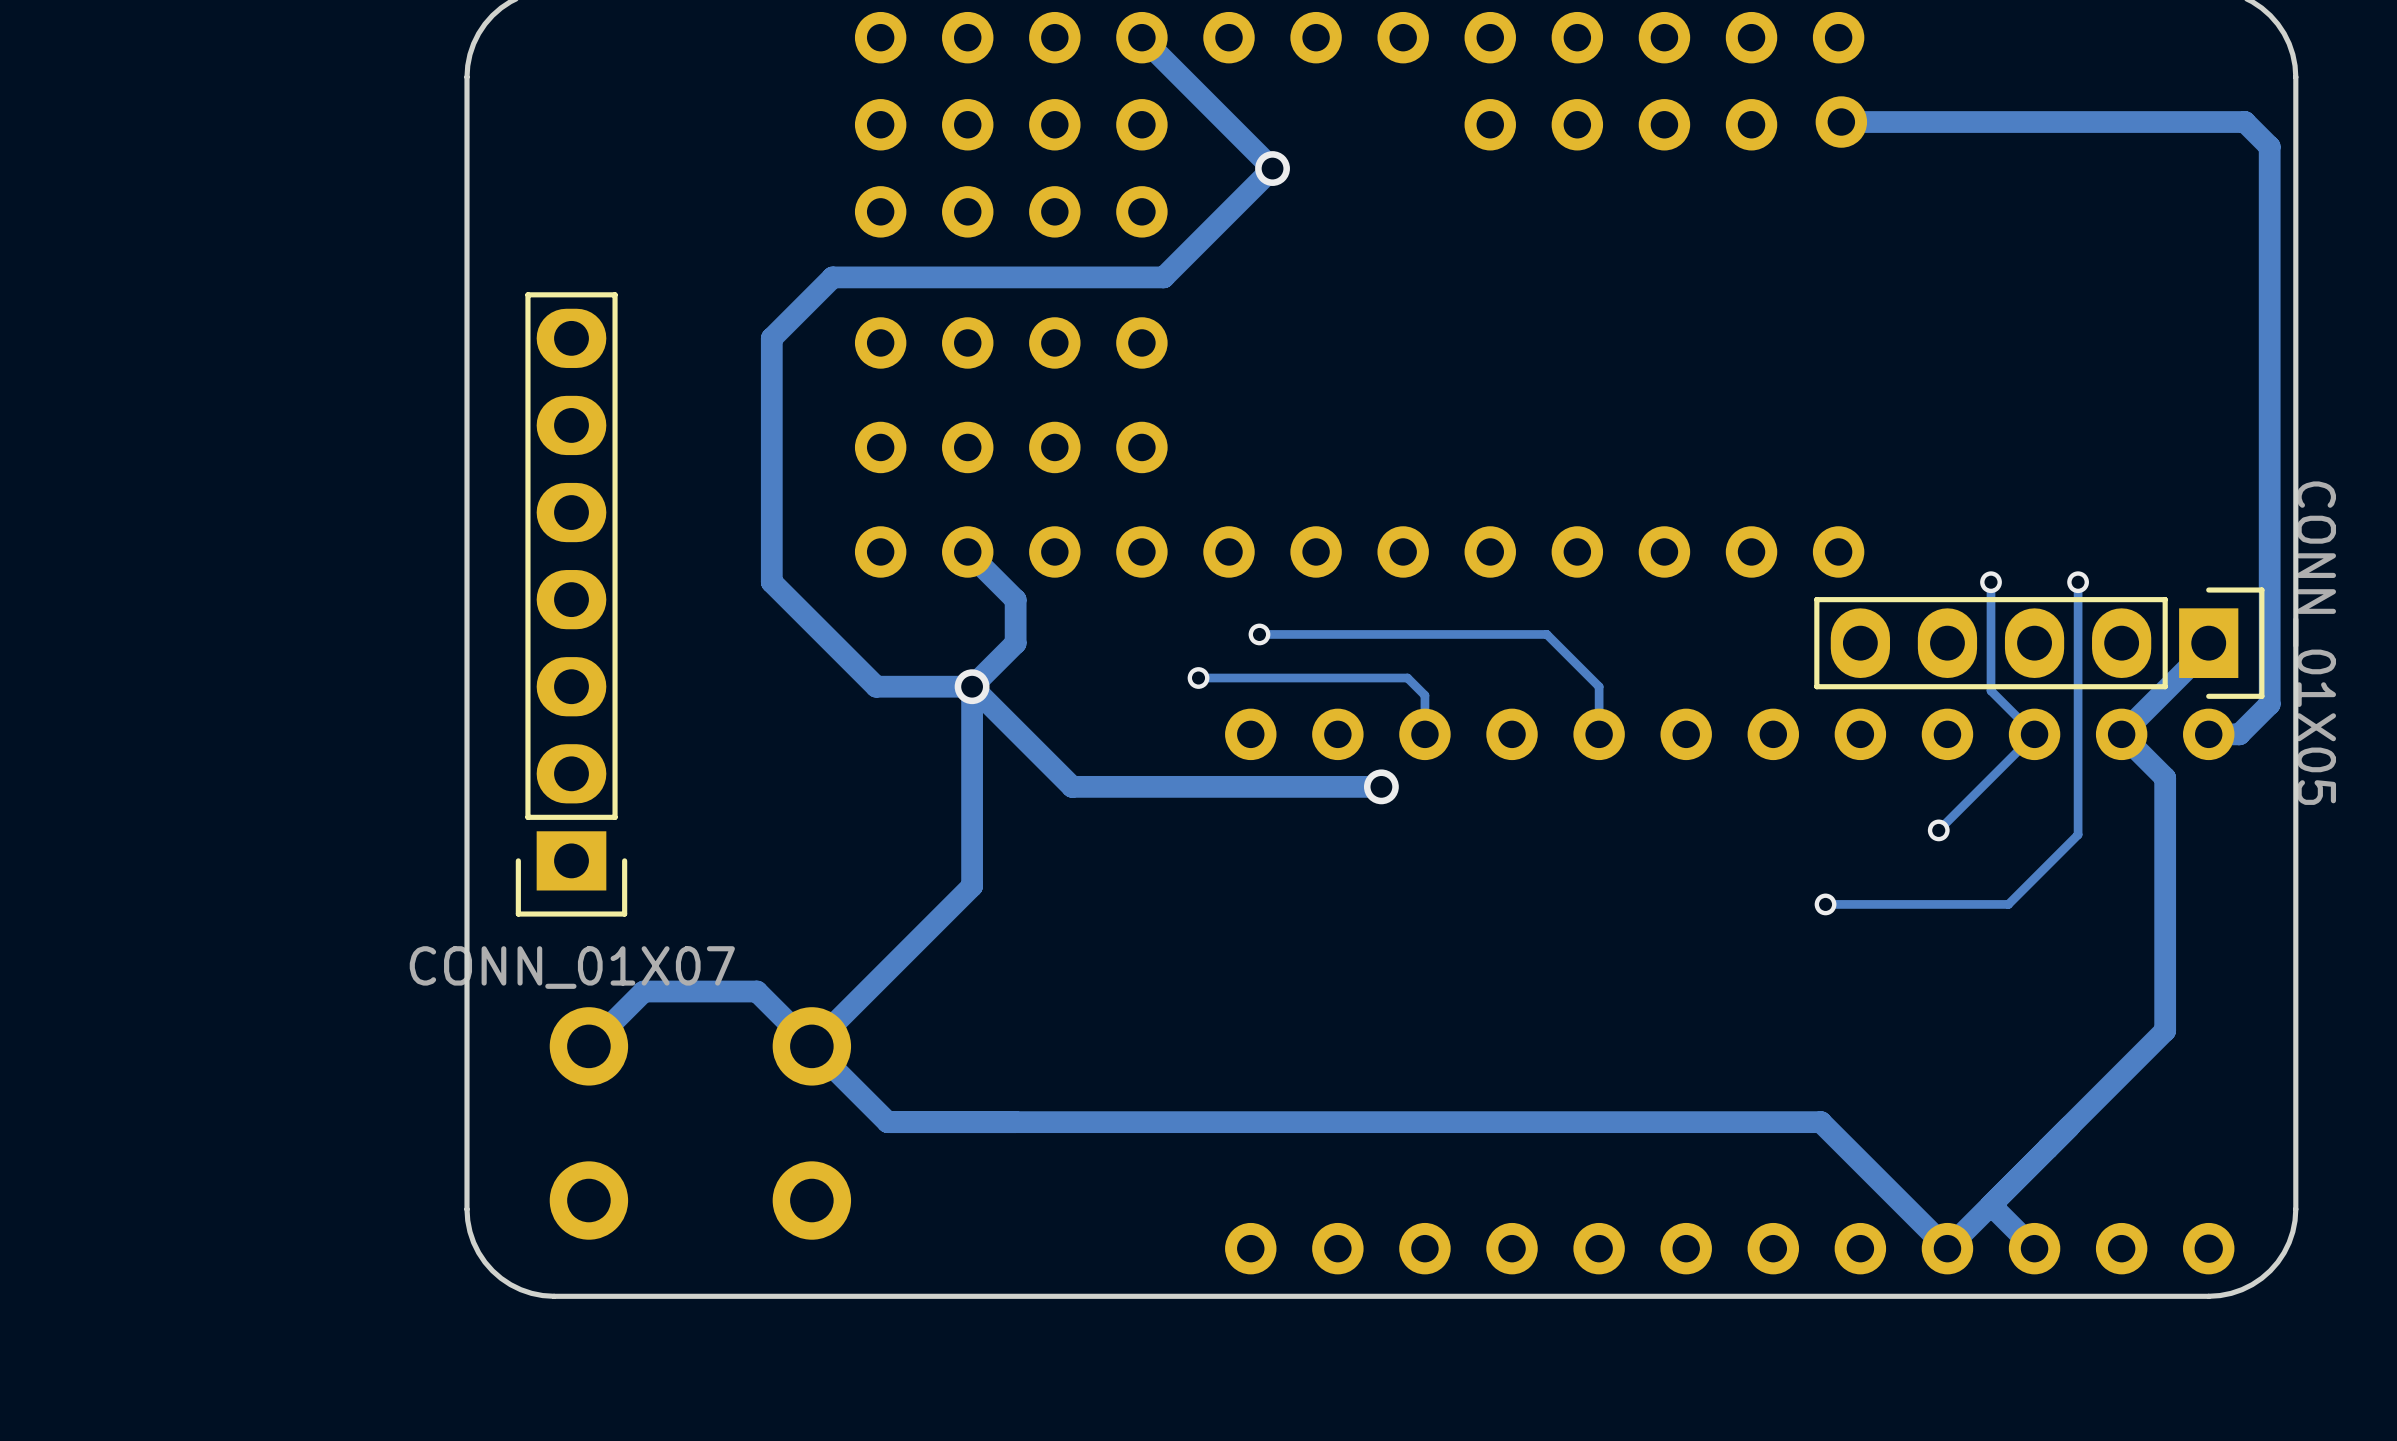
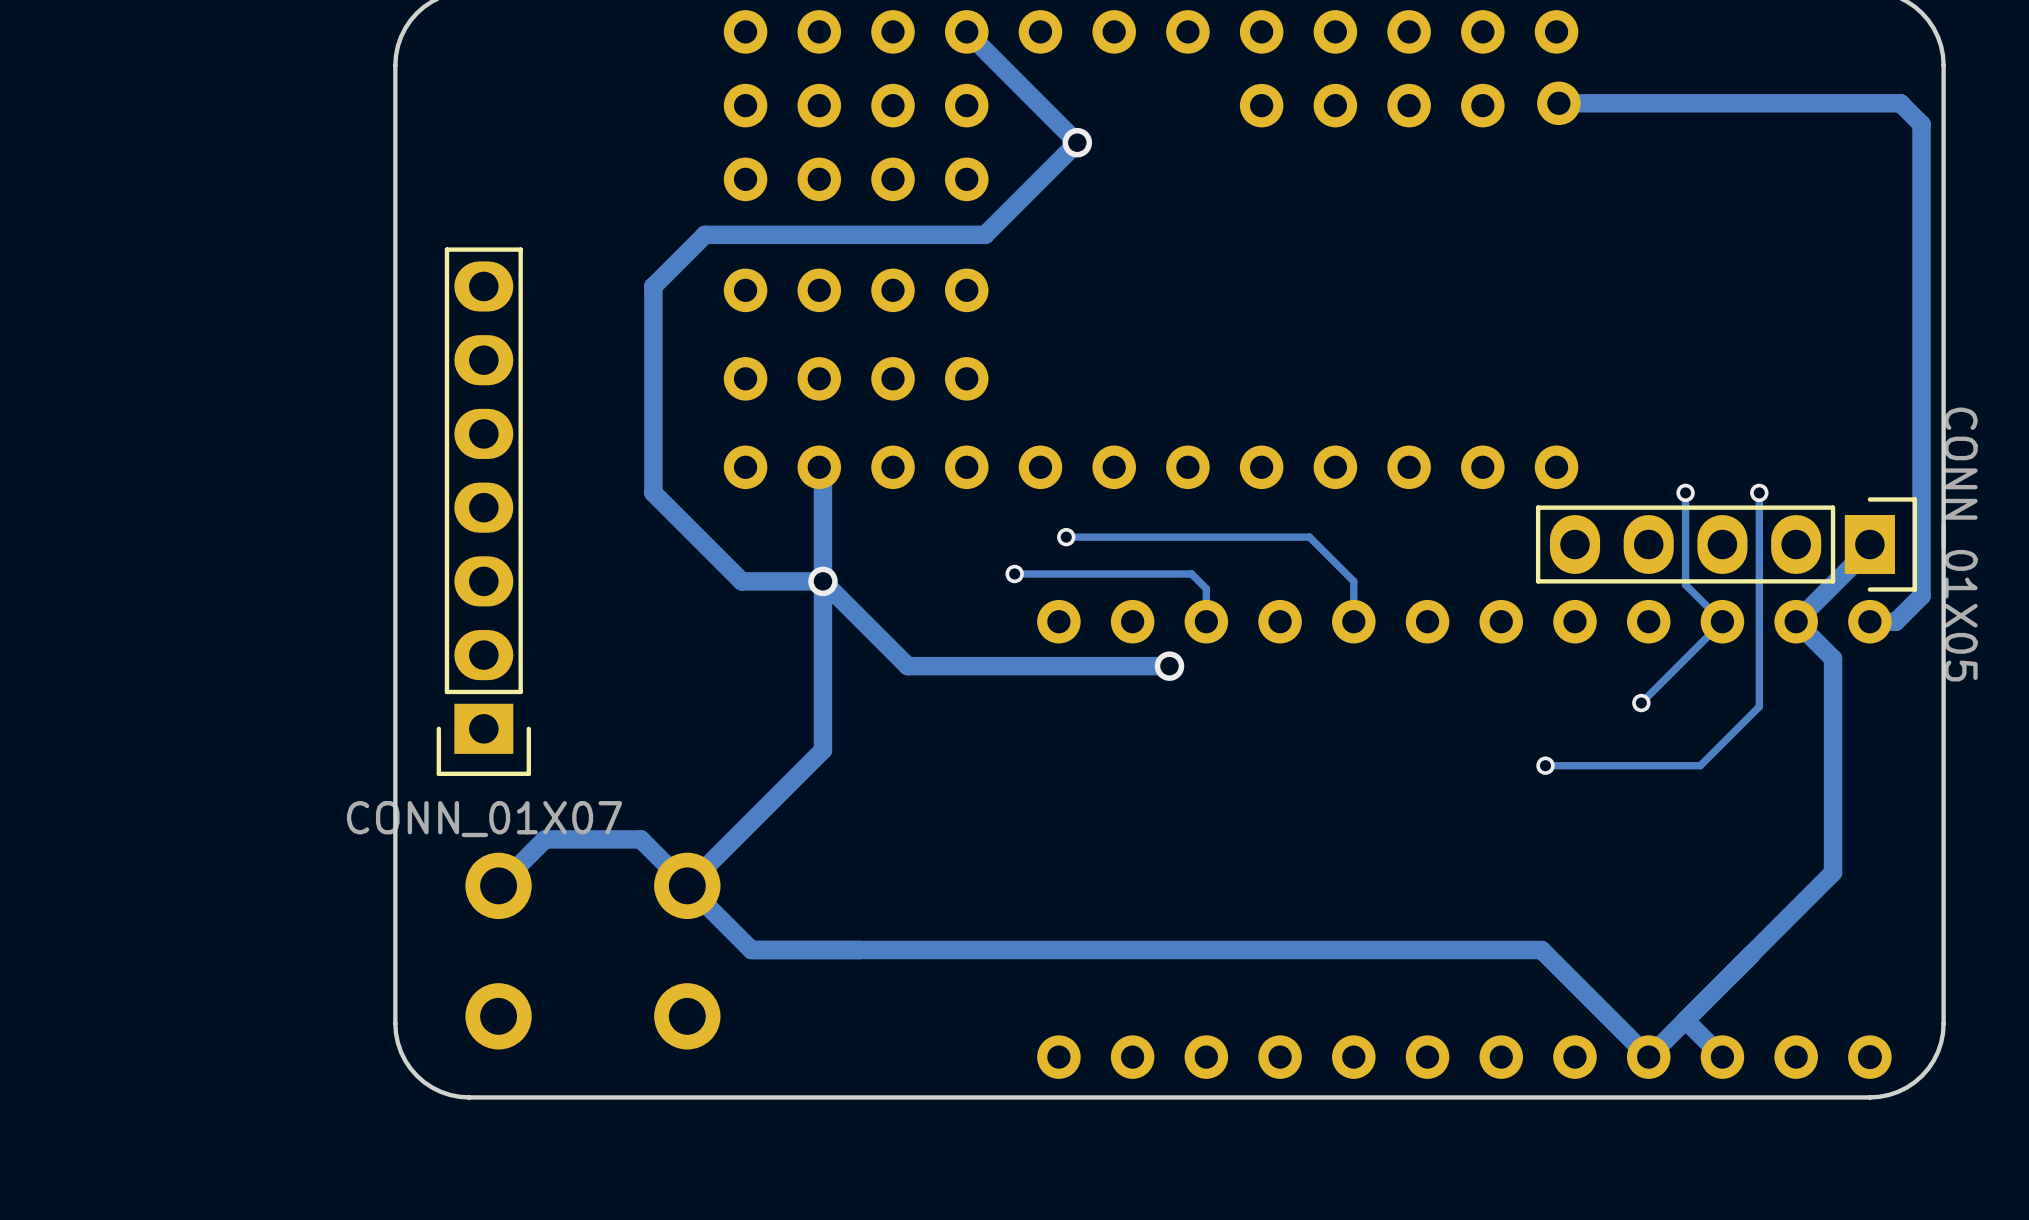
track: (972, 556) (1015, 599) (1015, 643) (972, 686) -> (822, 470) (822, 581)

